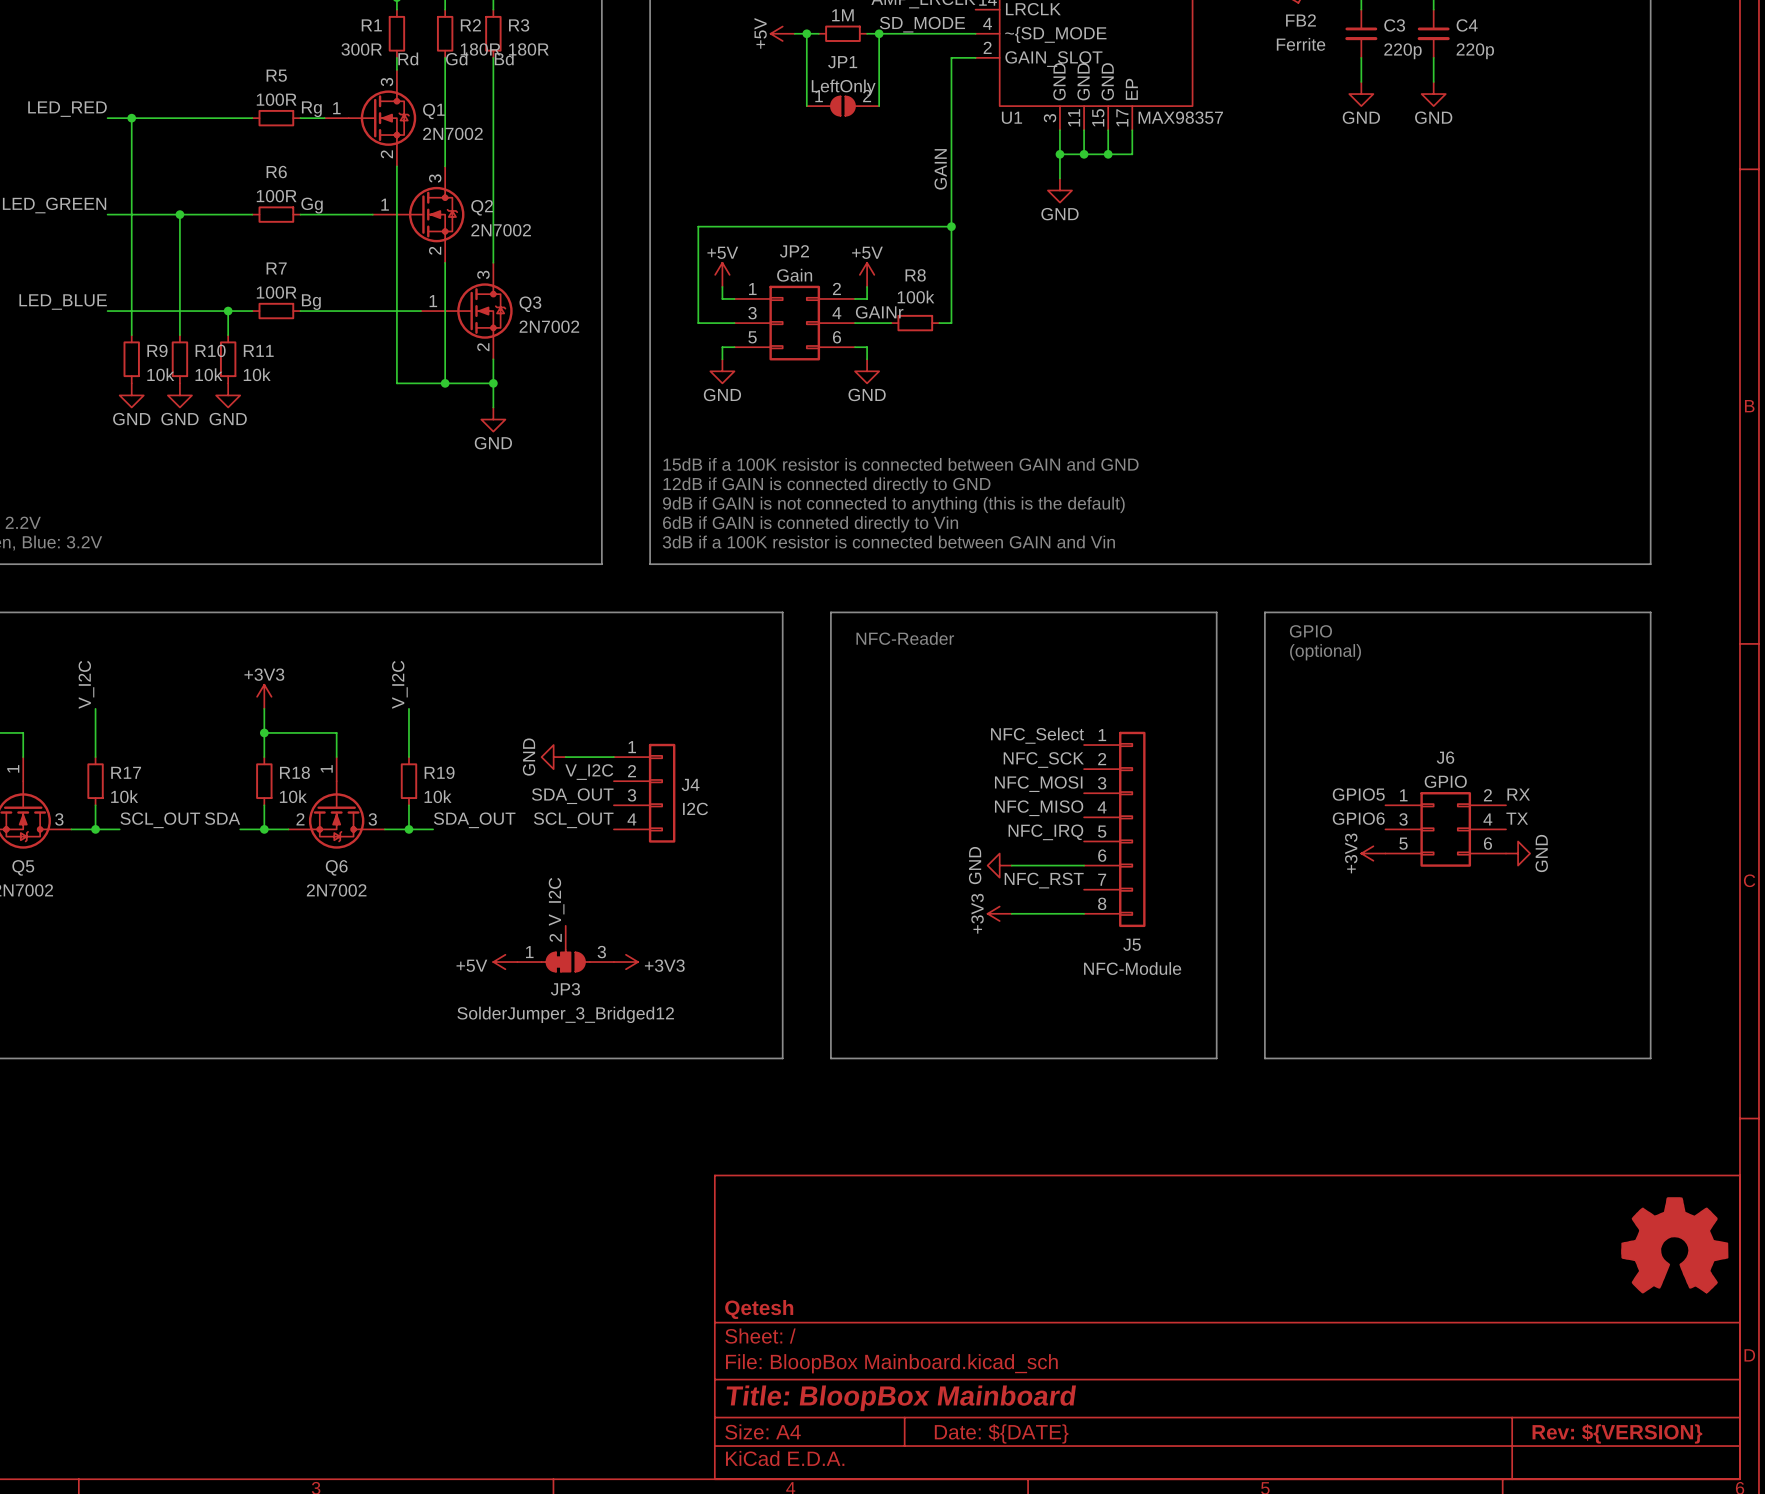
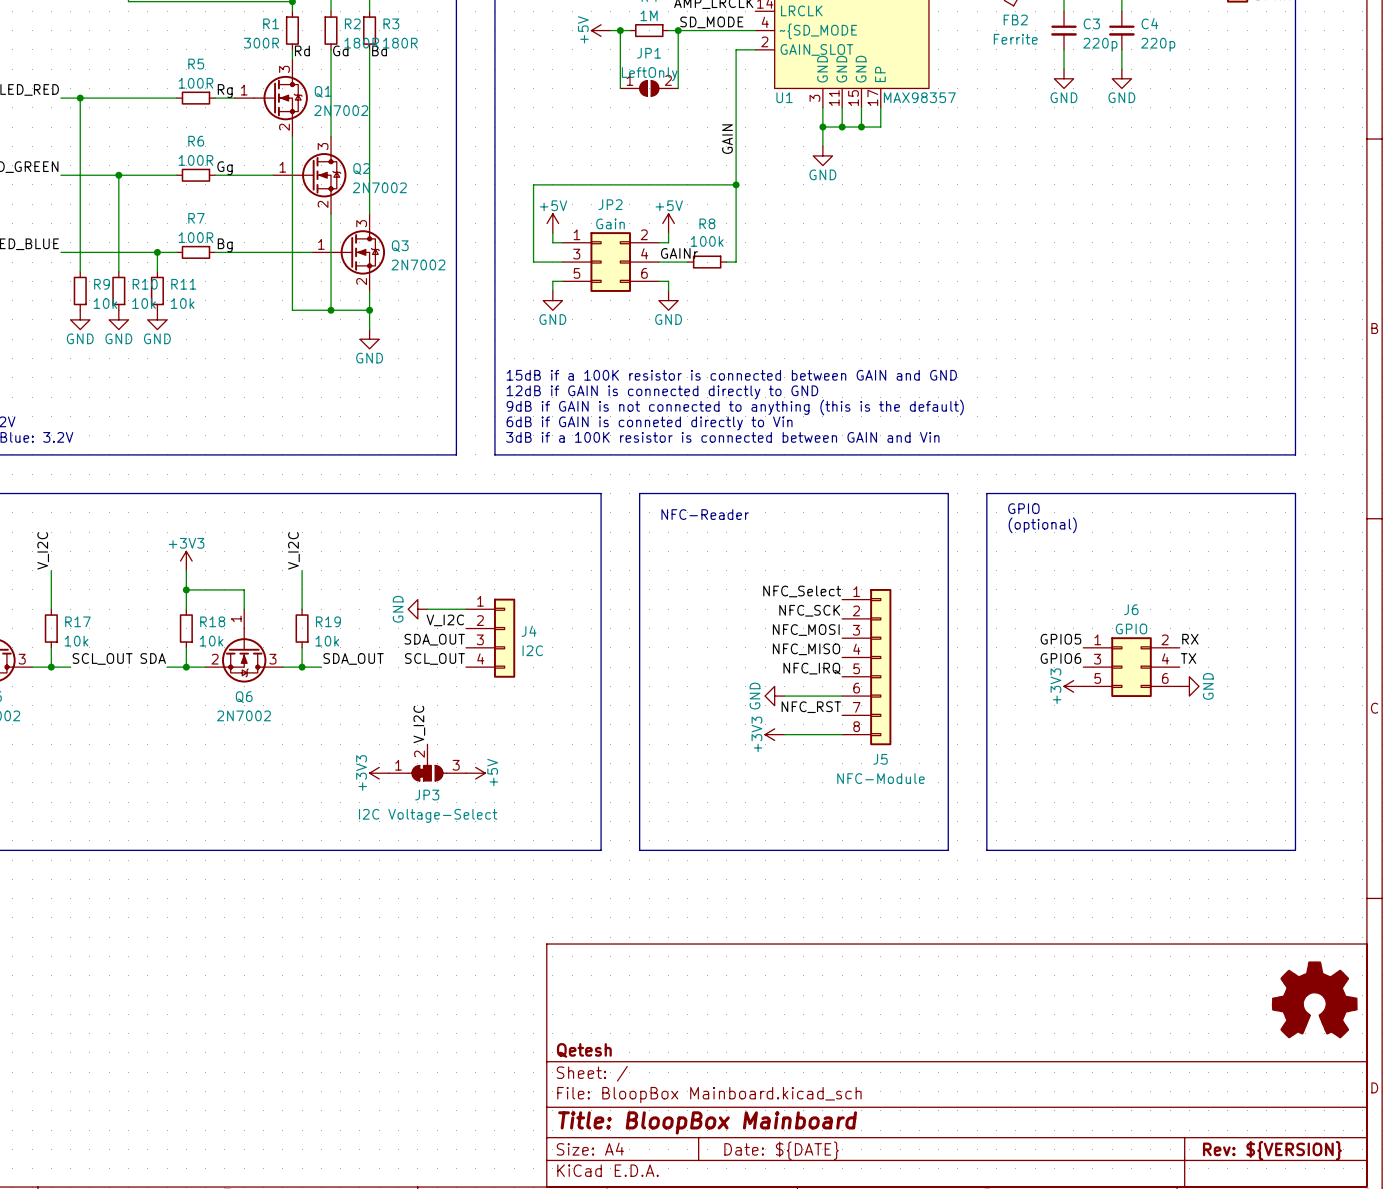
power symbol: +5V (505, 962) -> +3V3 (379, 773)
power symbol: +3V3 (625, 962) -> +5V (475, 773)
JP3 value: SolderJumper_3_Bridged12 (565, 1014) -> I2C Voltage-Select (428, 815)

